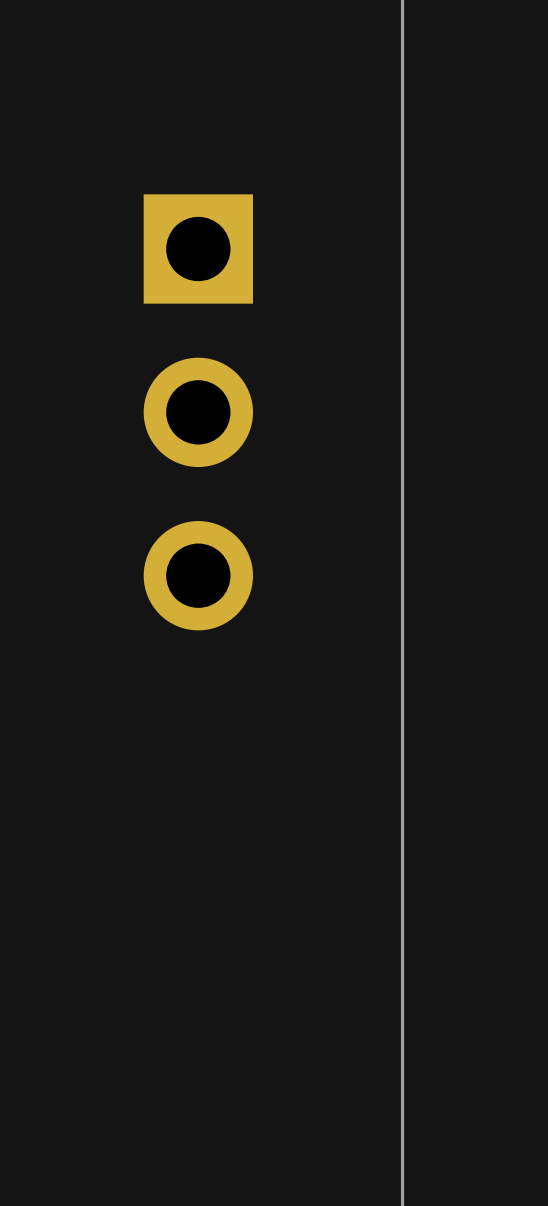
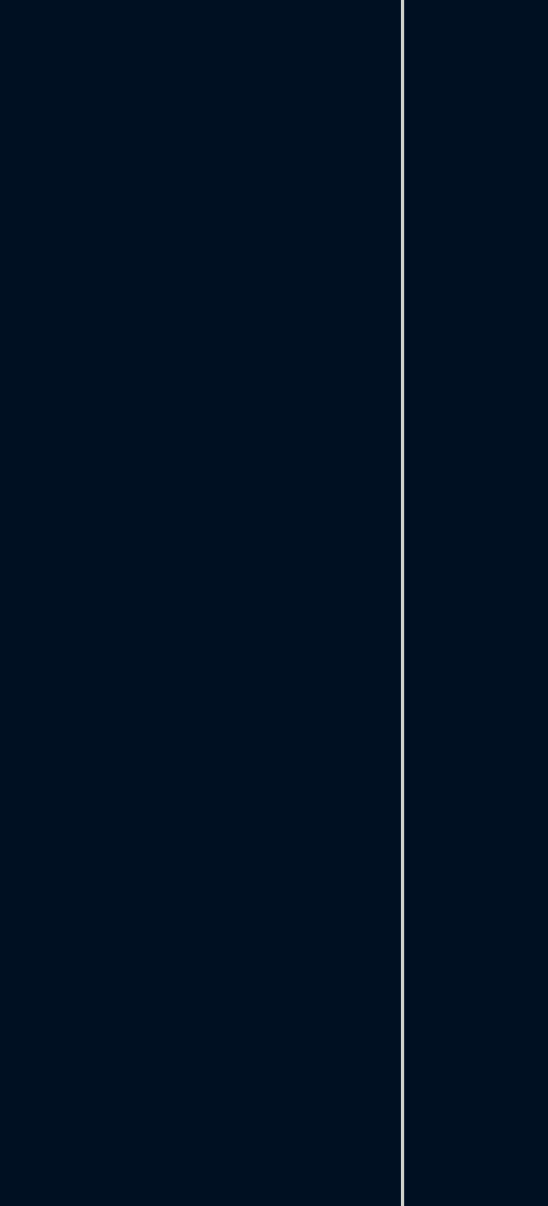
part: (198, 412) -> none

